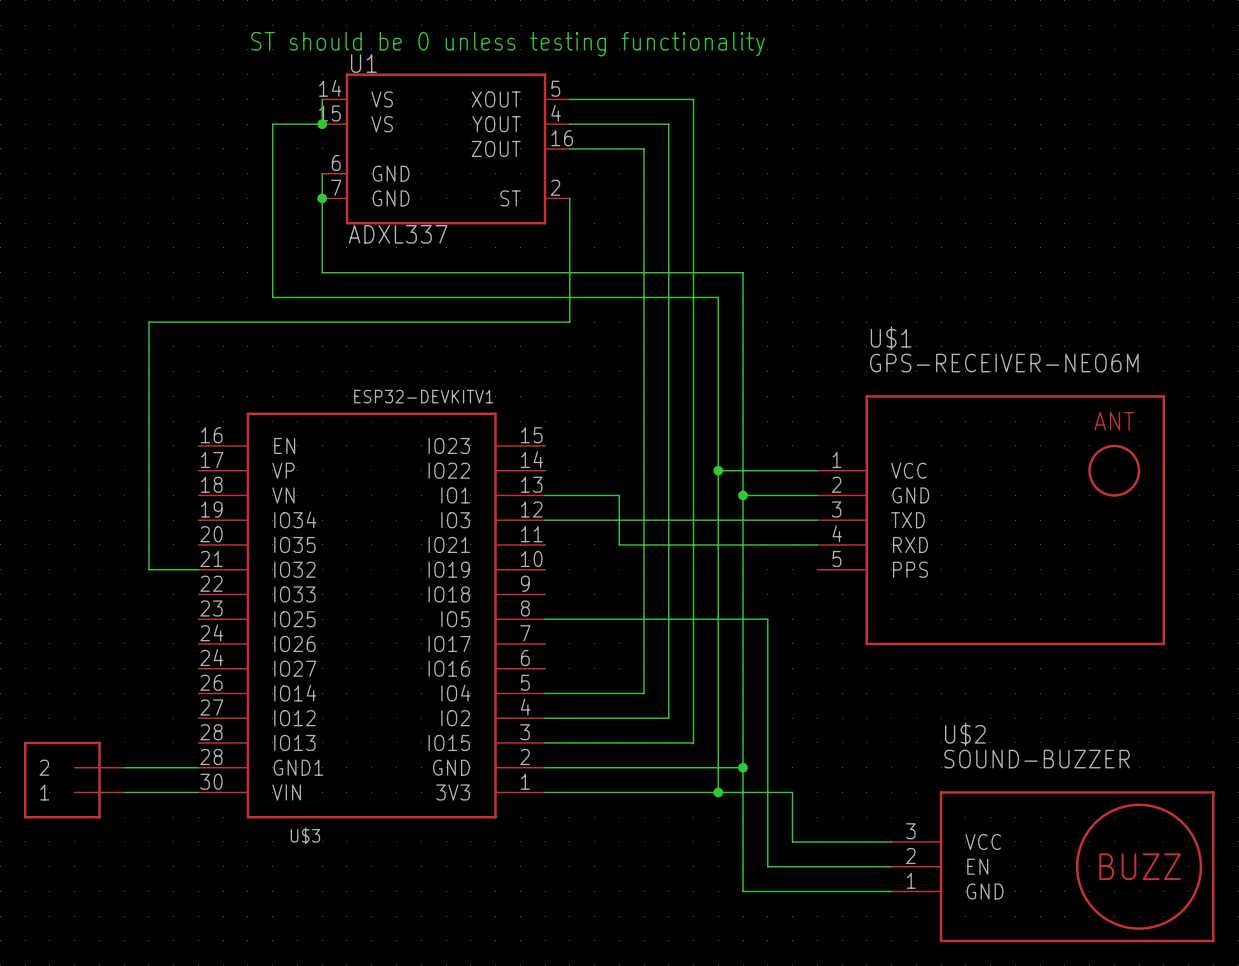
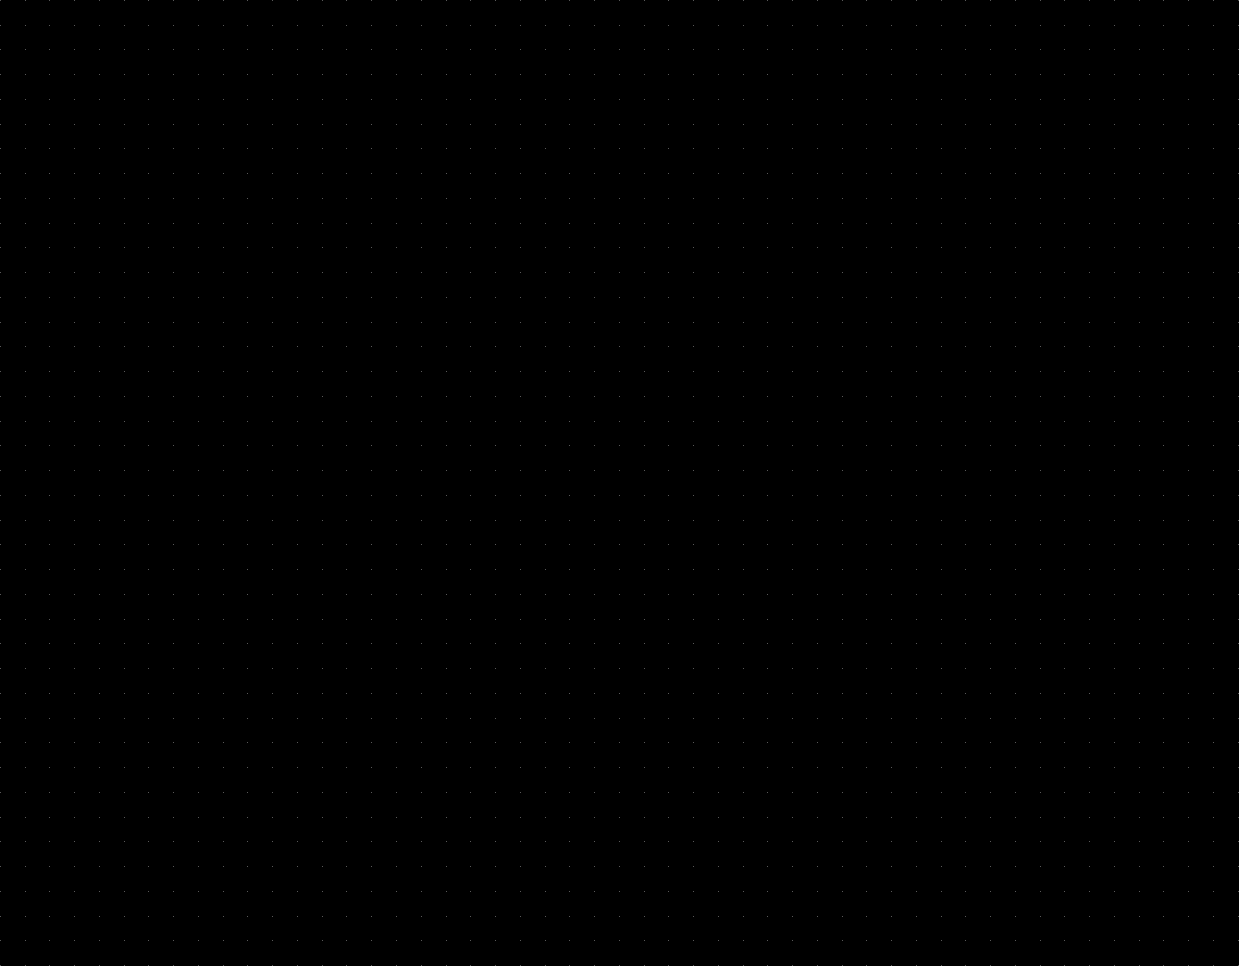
text: ST should be 0 unless testing functionality (508, 44) -> none
wire: (322, 99) (322, 124) (272, 124) (272, 297) (718, 297) (718, 792) -> none
wire: (569, 99) (693, 99) (693, 742) (545, 742) -> none
junction: (322, 124) -> none
wire: (569, 124) (668, 124) (668, 718) (545, 718) -> none
U1: ADXL337 (446, 148) -> none
wire: (569, 148) (644, 148) (644, 693) (545, 693) -> none
wire: (322, 173) (322, 272) (743, 272) (743, 891) (891, 891) -> none
junction: (322, 198) -> none
wire: (569, 198) (569, 322) (148, 322) (148, 569) (198, 569) -> none
wire: (718, 470) (817, 470) -> none
junction: (718, 470) -> none
wire: (545, 495) (619, 495) (619, 544) (817, 544) -> none
wire: (743, 495) (817, 495) -> none
junction: (743, 495) -> none
wire: (545, 520) (817, 520) -> none
U$1: GPS-RECEIVER-NEO6M (991, 520) -> none
U$3: (371, 615) -> none
wire: (545, 619) (767, 619) (767, 866) (891, 866) -> none
wire: (124, 767) (198, 767) -> none
wire: (545, 767) (743, 767) -> none
junction: (743, 767) -> none
part: (74, 780) -> none
wire: (124, 792) (198, 792) -> none
wire: (545, 792) (792, 792) (792, 841) (891, 841) -> none
junction: (718, 792) -> none
U$2: SOUND-BUZZER (1053, 866) -> none

